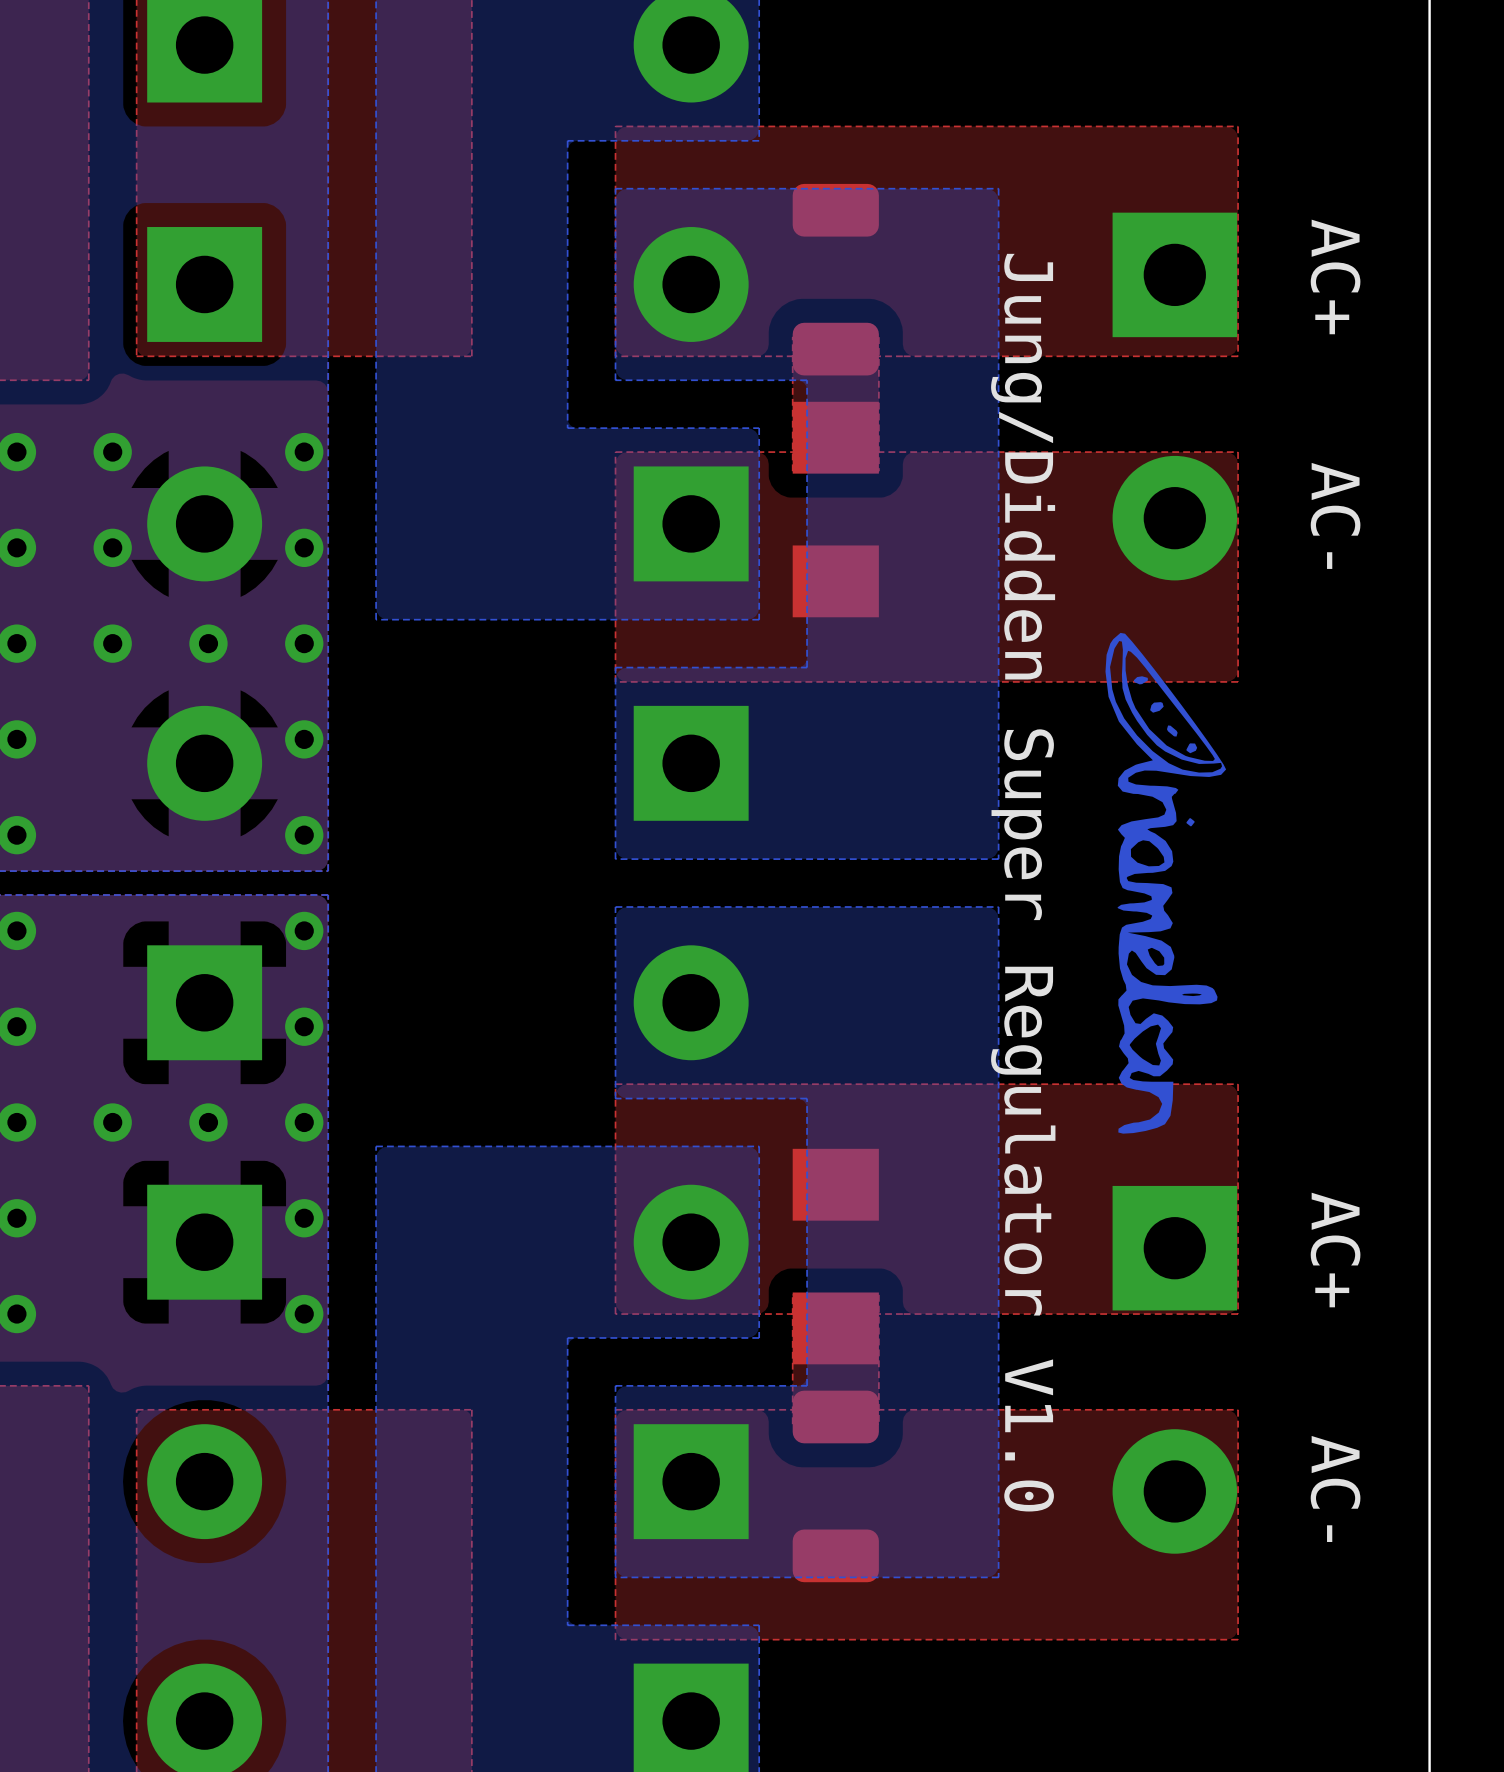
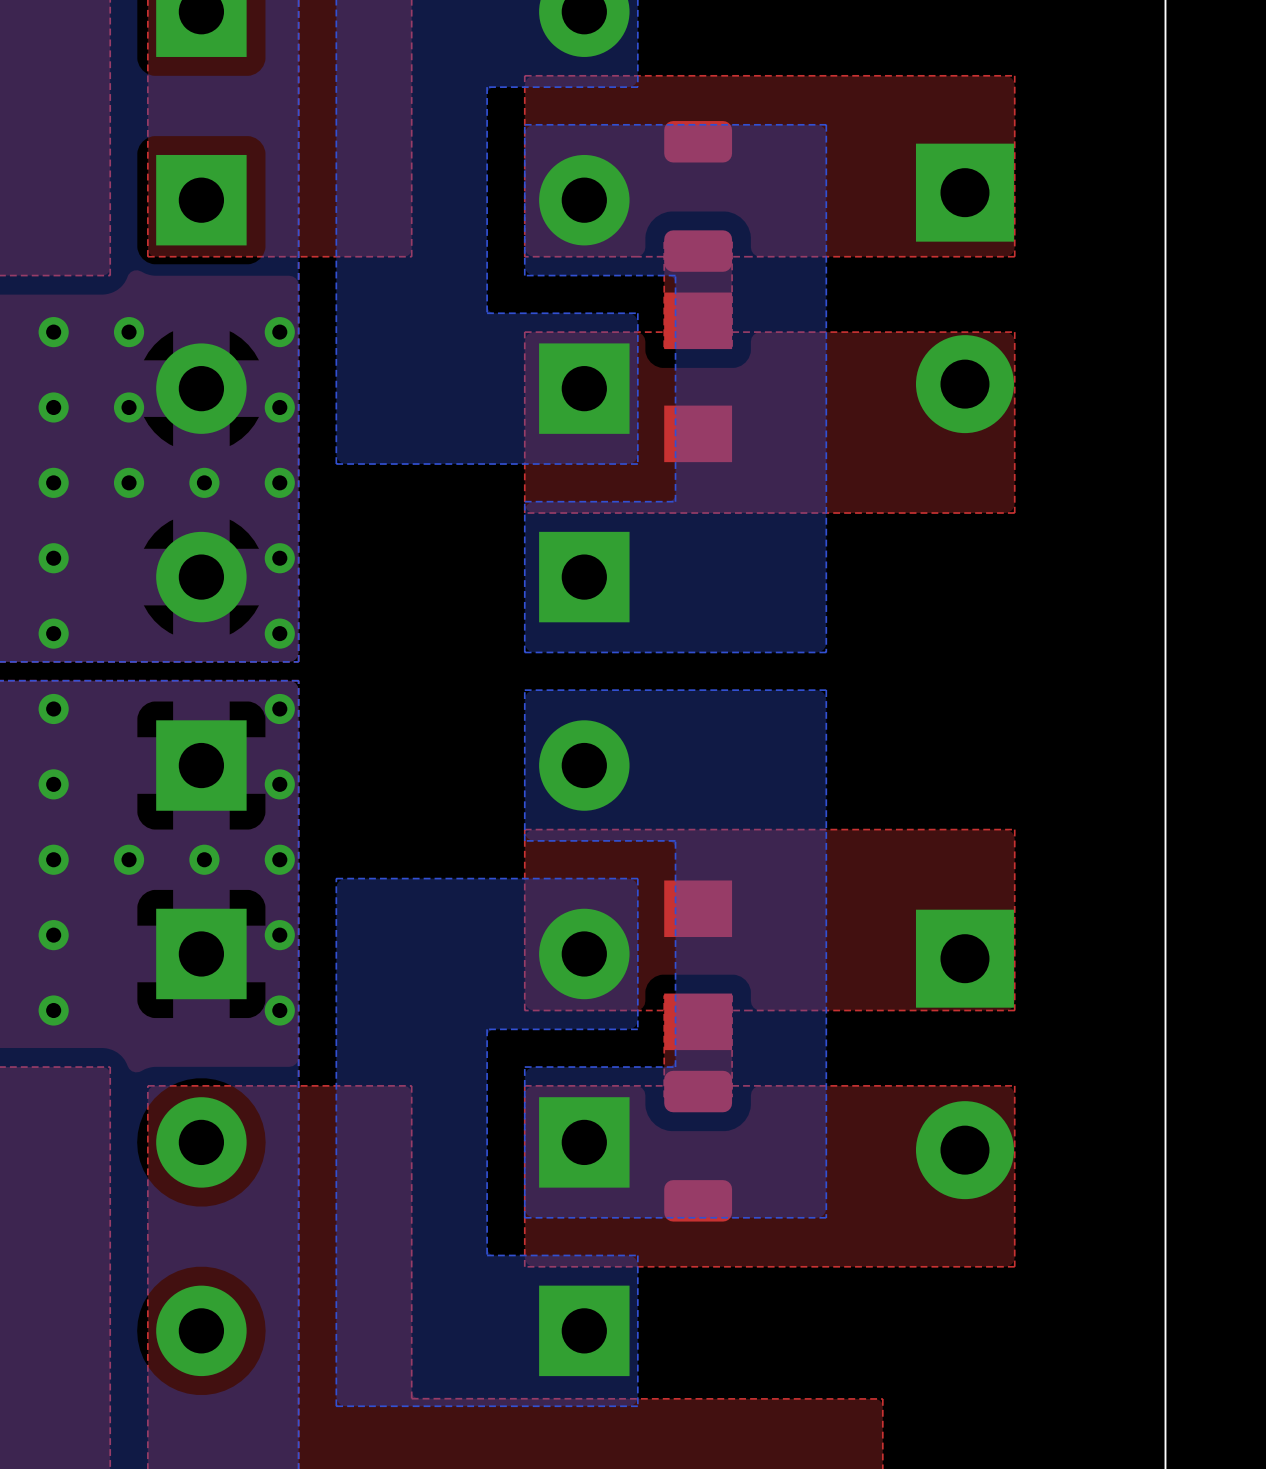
text: AC+ (1335, 276) -> none
text: AC- (1335, 515) -> none
drawing: [1105, 632, 1227, 1134] -> none
text: Jung/Didden Super Regulator V1.0 (1023, 882) -> none
text: AC+ (1335, 1250) -> none
text: AC- (1335, 1488) -> none

